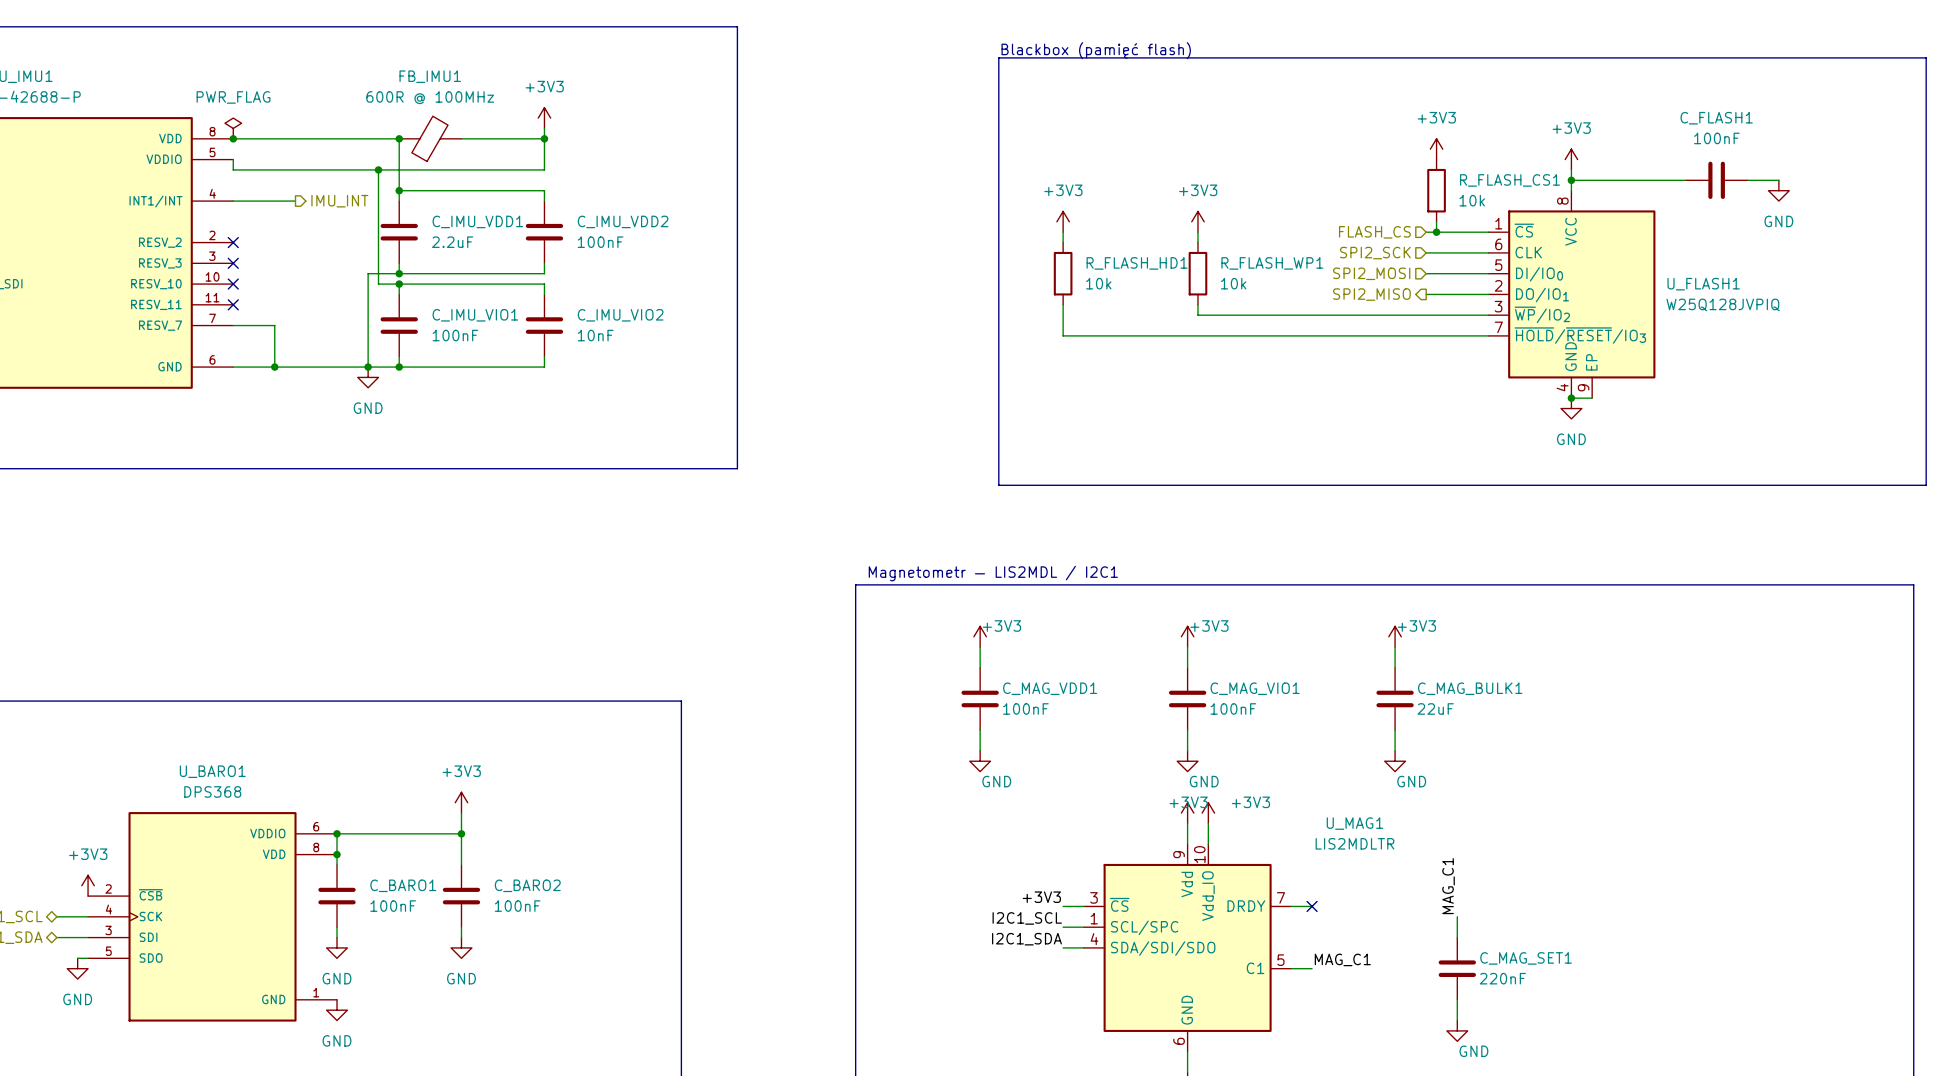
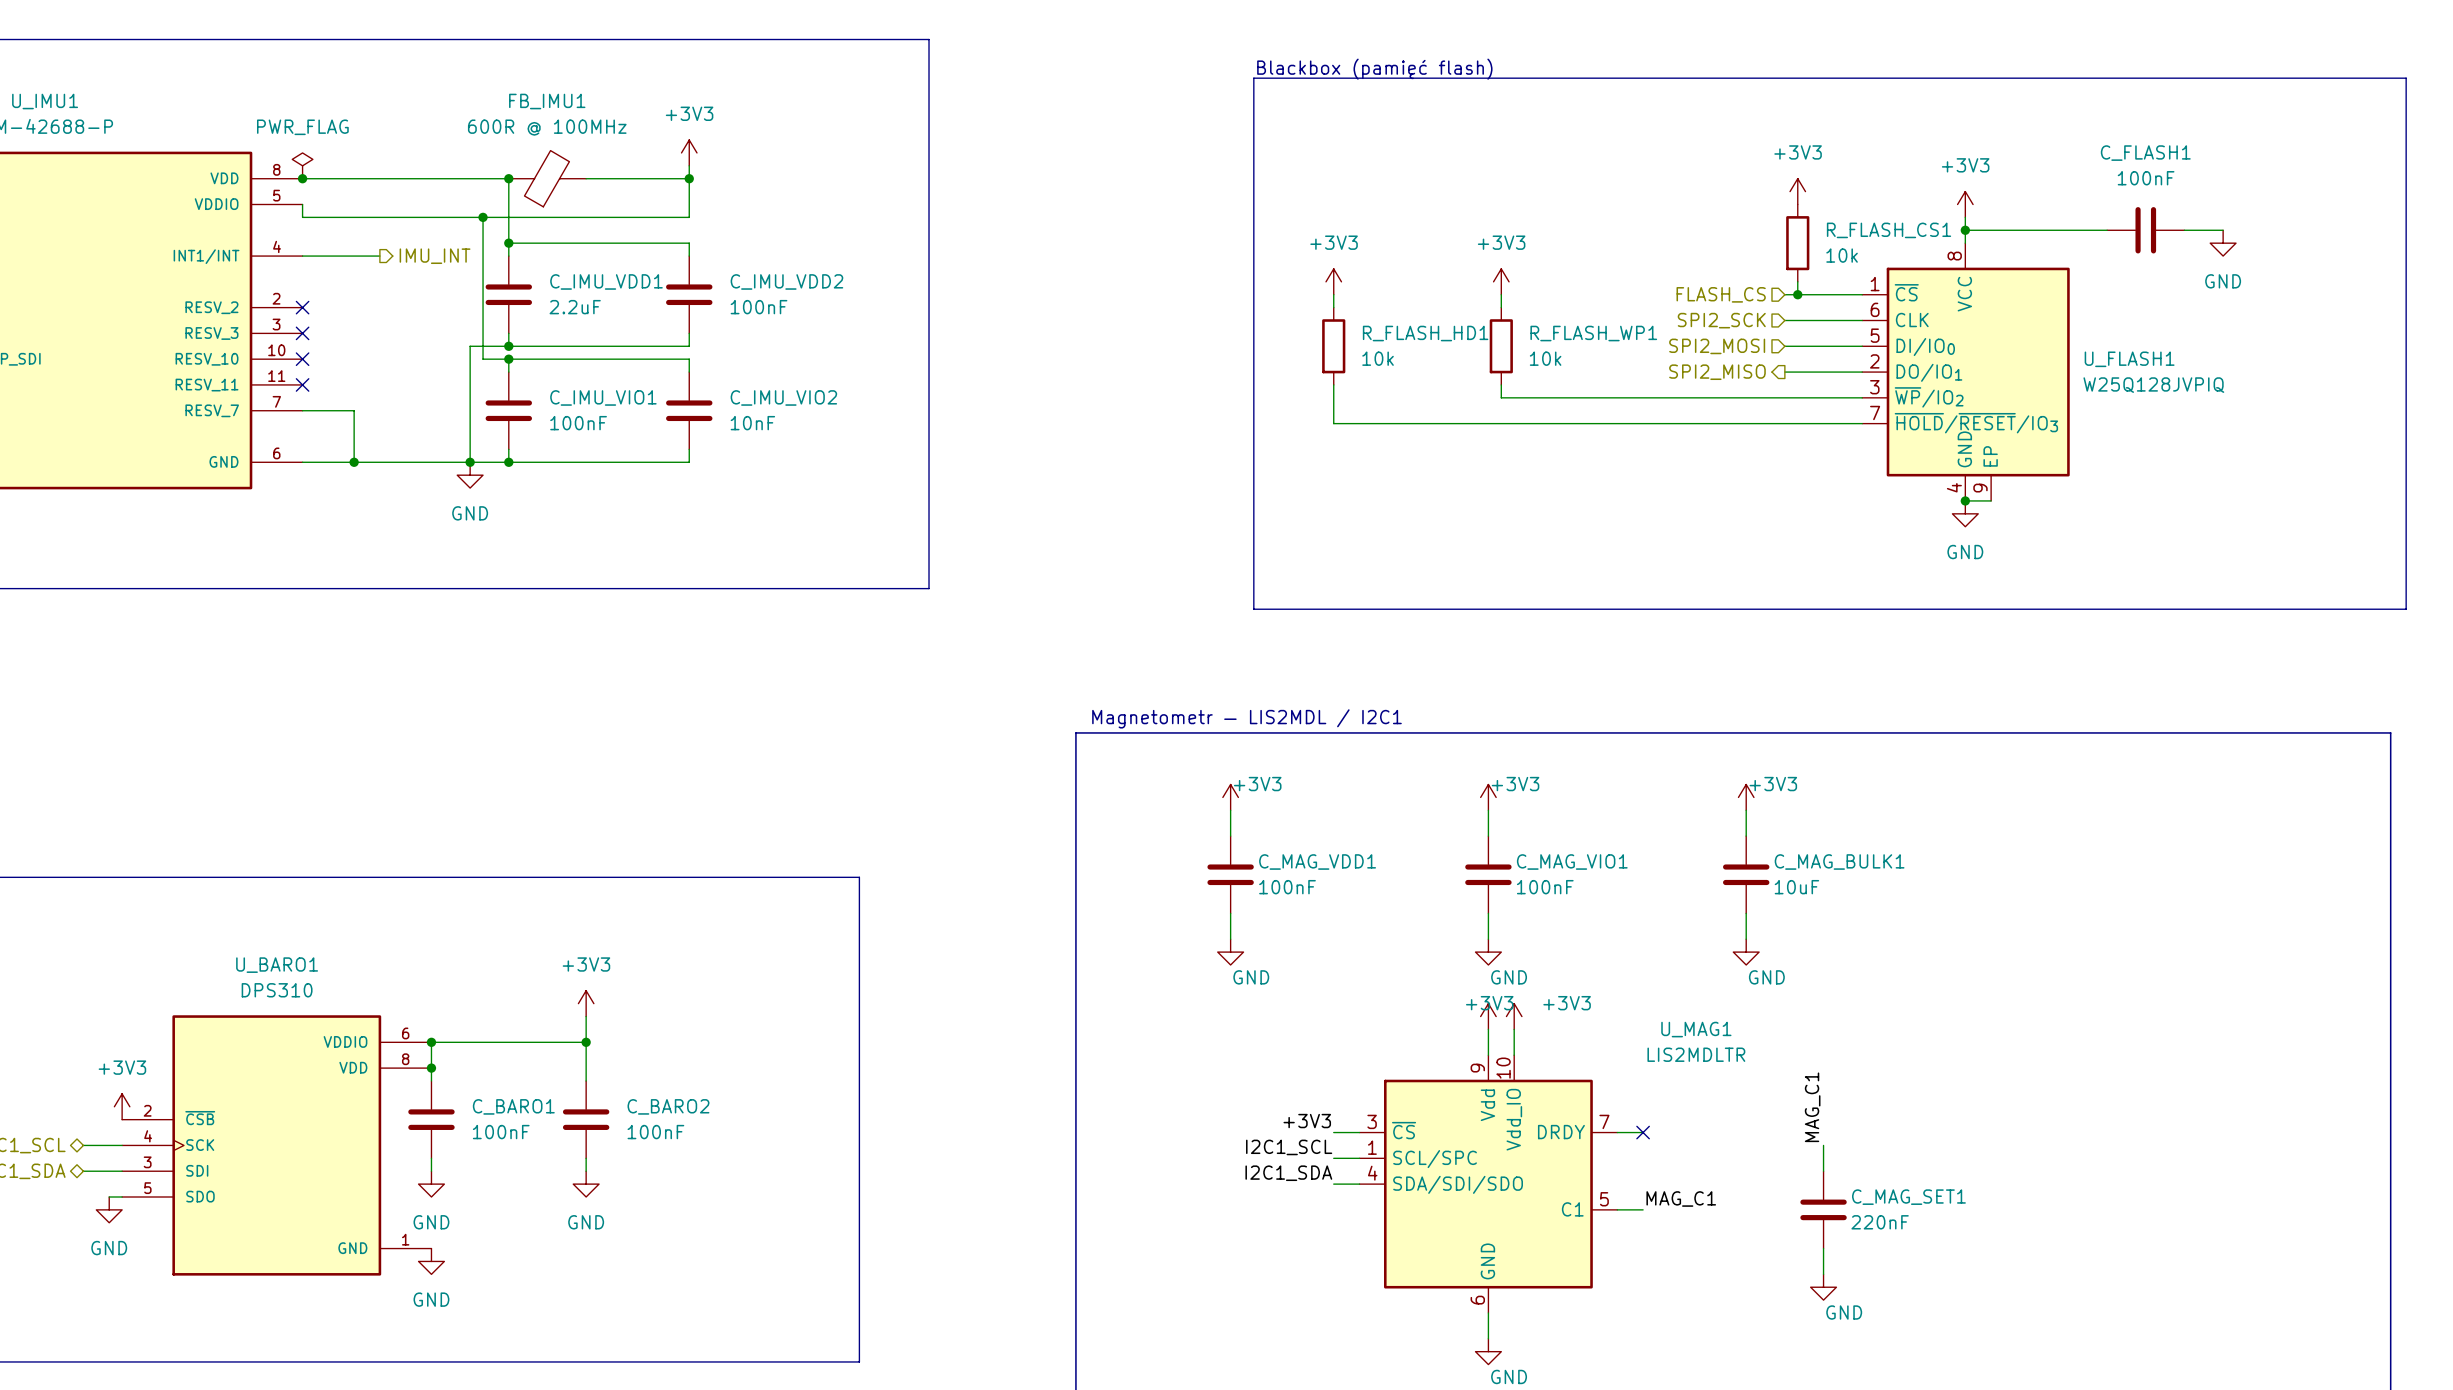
C_MAG_BULK1 value: 22uF (1435, 708) -> 10uF (1796, 887)
U_BARO1 value: DPS368 (212, 791) -> DPS310 (277, 990)

